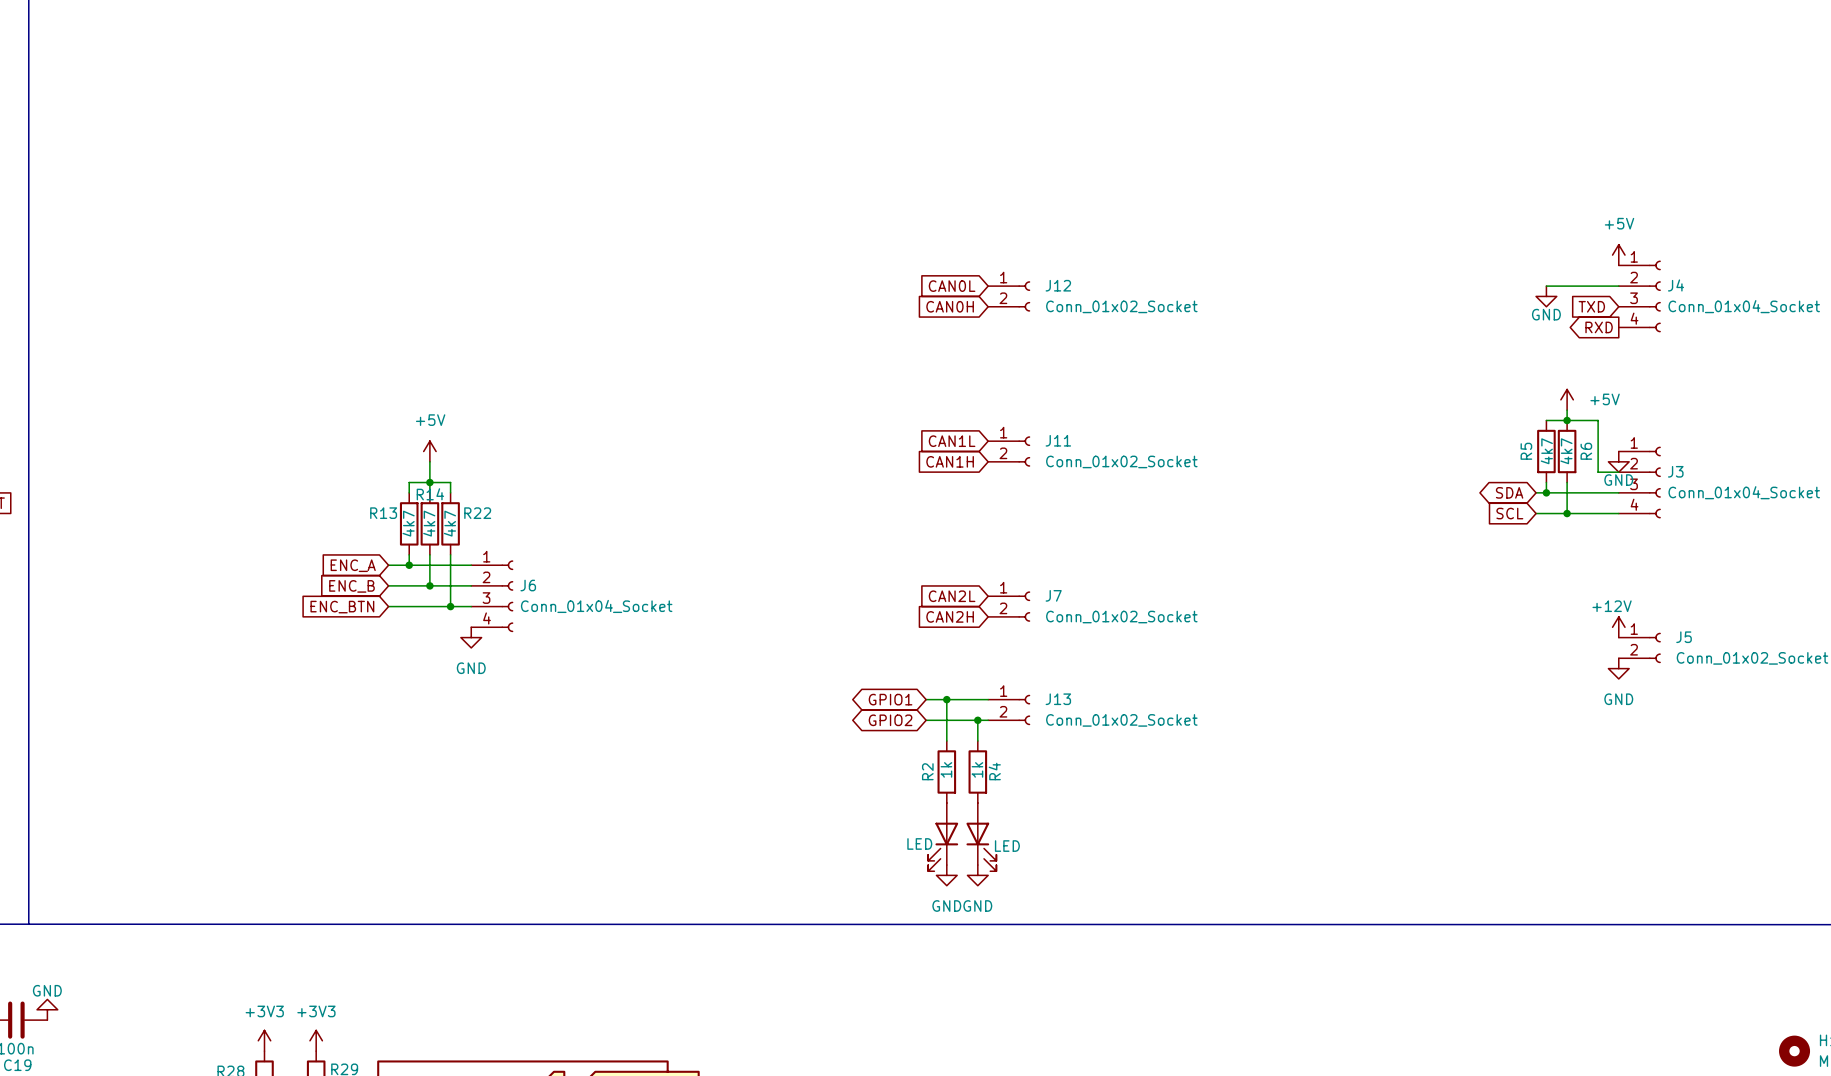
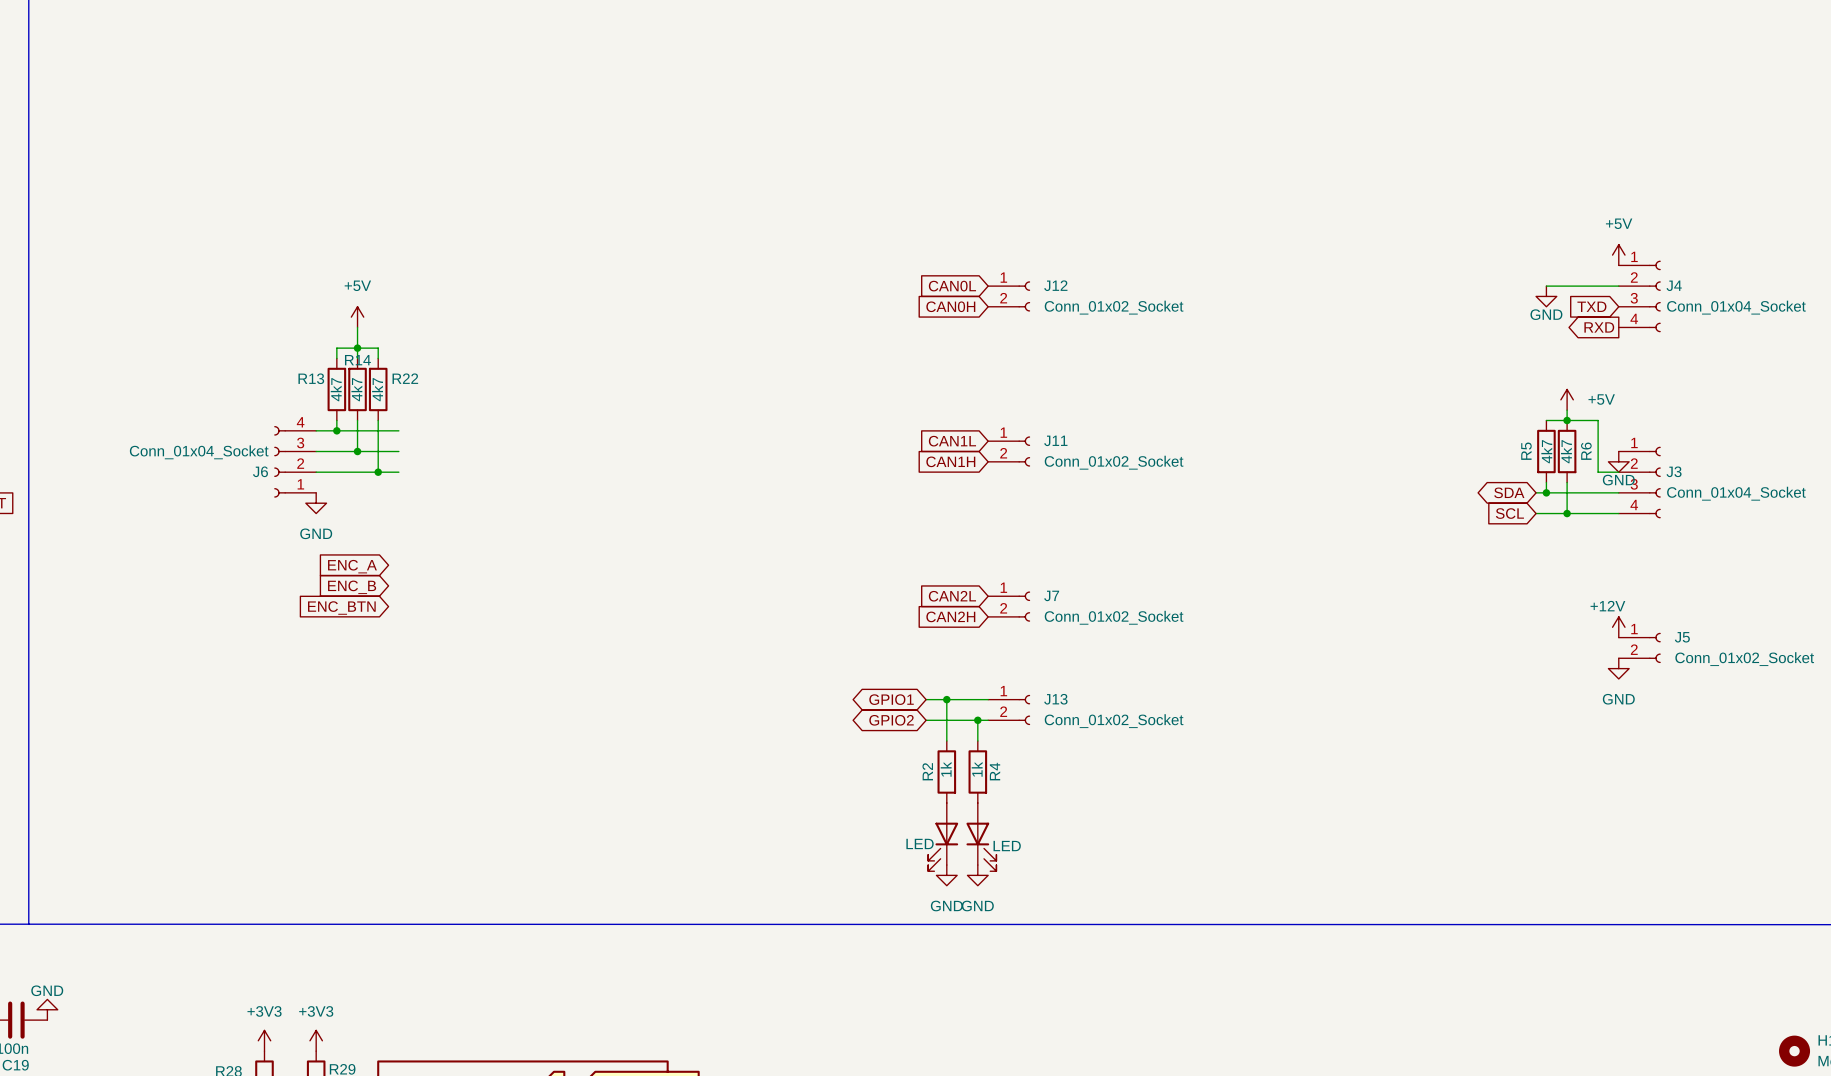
junction: none -> (357, 348)
junction: none -> (336, 430)
junction: none -> (357, 451)
power symbol position: +5V (429, 451) -> +5V (357, 317)
wire: (429, 461) (429, 492) -> (357, 327) (357, 358)
junction: none -> (378, 472)
junction: (429, 482) -> none
wire: (409, 492) (409, 482) (450, 482) (450, 492) -> (336, 358) (336, 348) (378, 348) (378, 358)
power symbol: none -> GND (316, 503)
R13 position: (409, 523) -> (336, 389)
R14 position: (429, 523) -> (357, 389)
R22 position: (450, 523) -> (378, 389)
wire: (409, 554) (409, 565) -> (336, 420) (336, 430)
wire: (429, 554) (429, 585) -> (357, 420) (357, 451)
wire: (450, 554) (450, 606) -> (378, 420) (378, 472)
wire: (388, 565) (471, 565) -> (316, 430) (398, 430)
junction: (409, 565) -> none
wire: (388, 585) (471, 585) -> (316, 451) (398, 451)
junction: (429, 585) -> none
J6 position: (492, 596) -> (295, 461)
J6 rotation: 0° (507, 596) -> 180° (280, 461)
wire: (388, 606) (471, 606) -> (316, 472) (398, 472)
junction: (450, 606) -> none
power symbol: GND (471, 637) -> none

